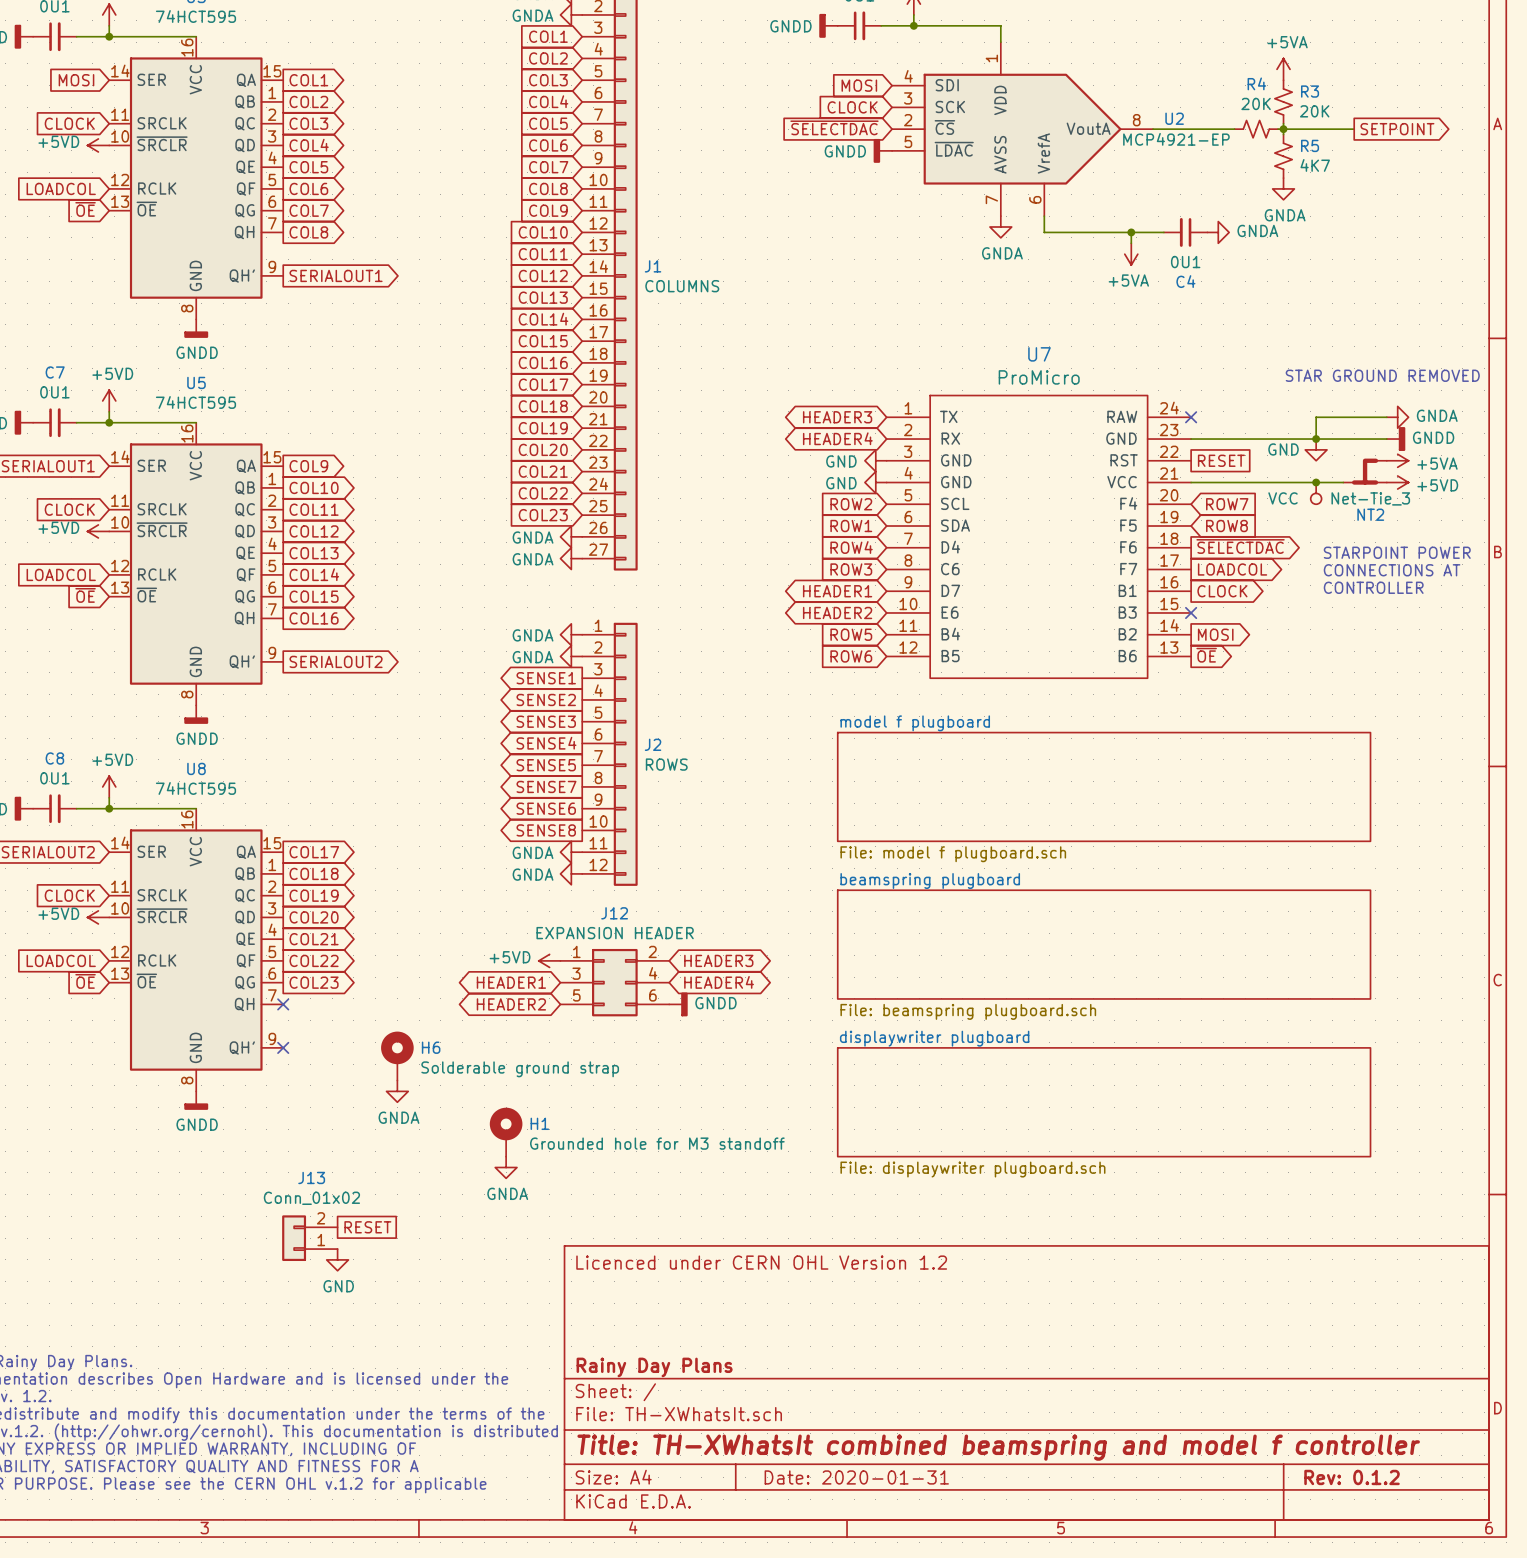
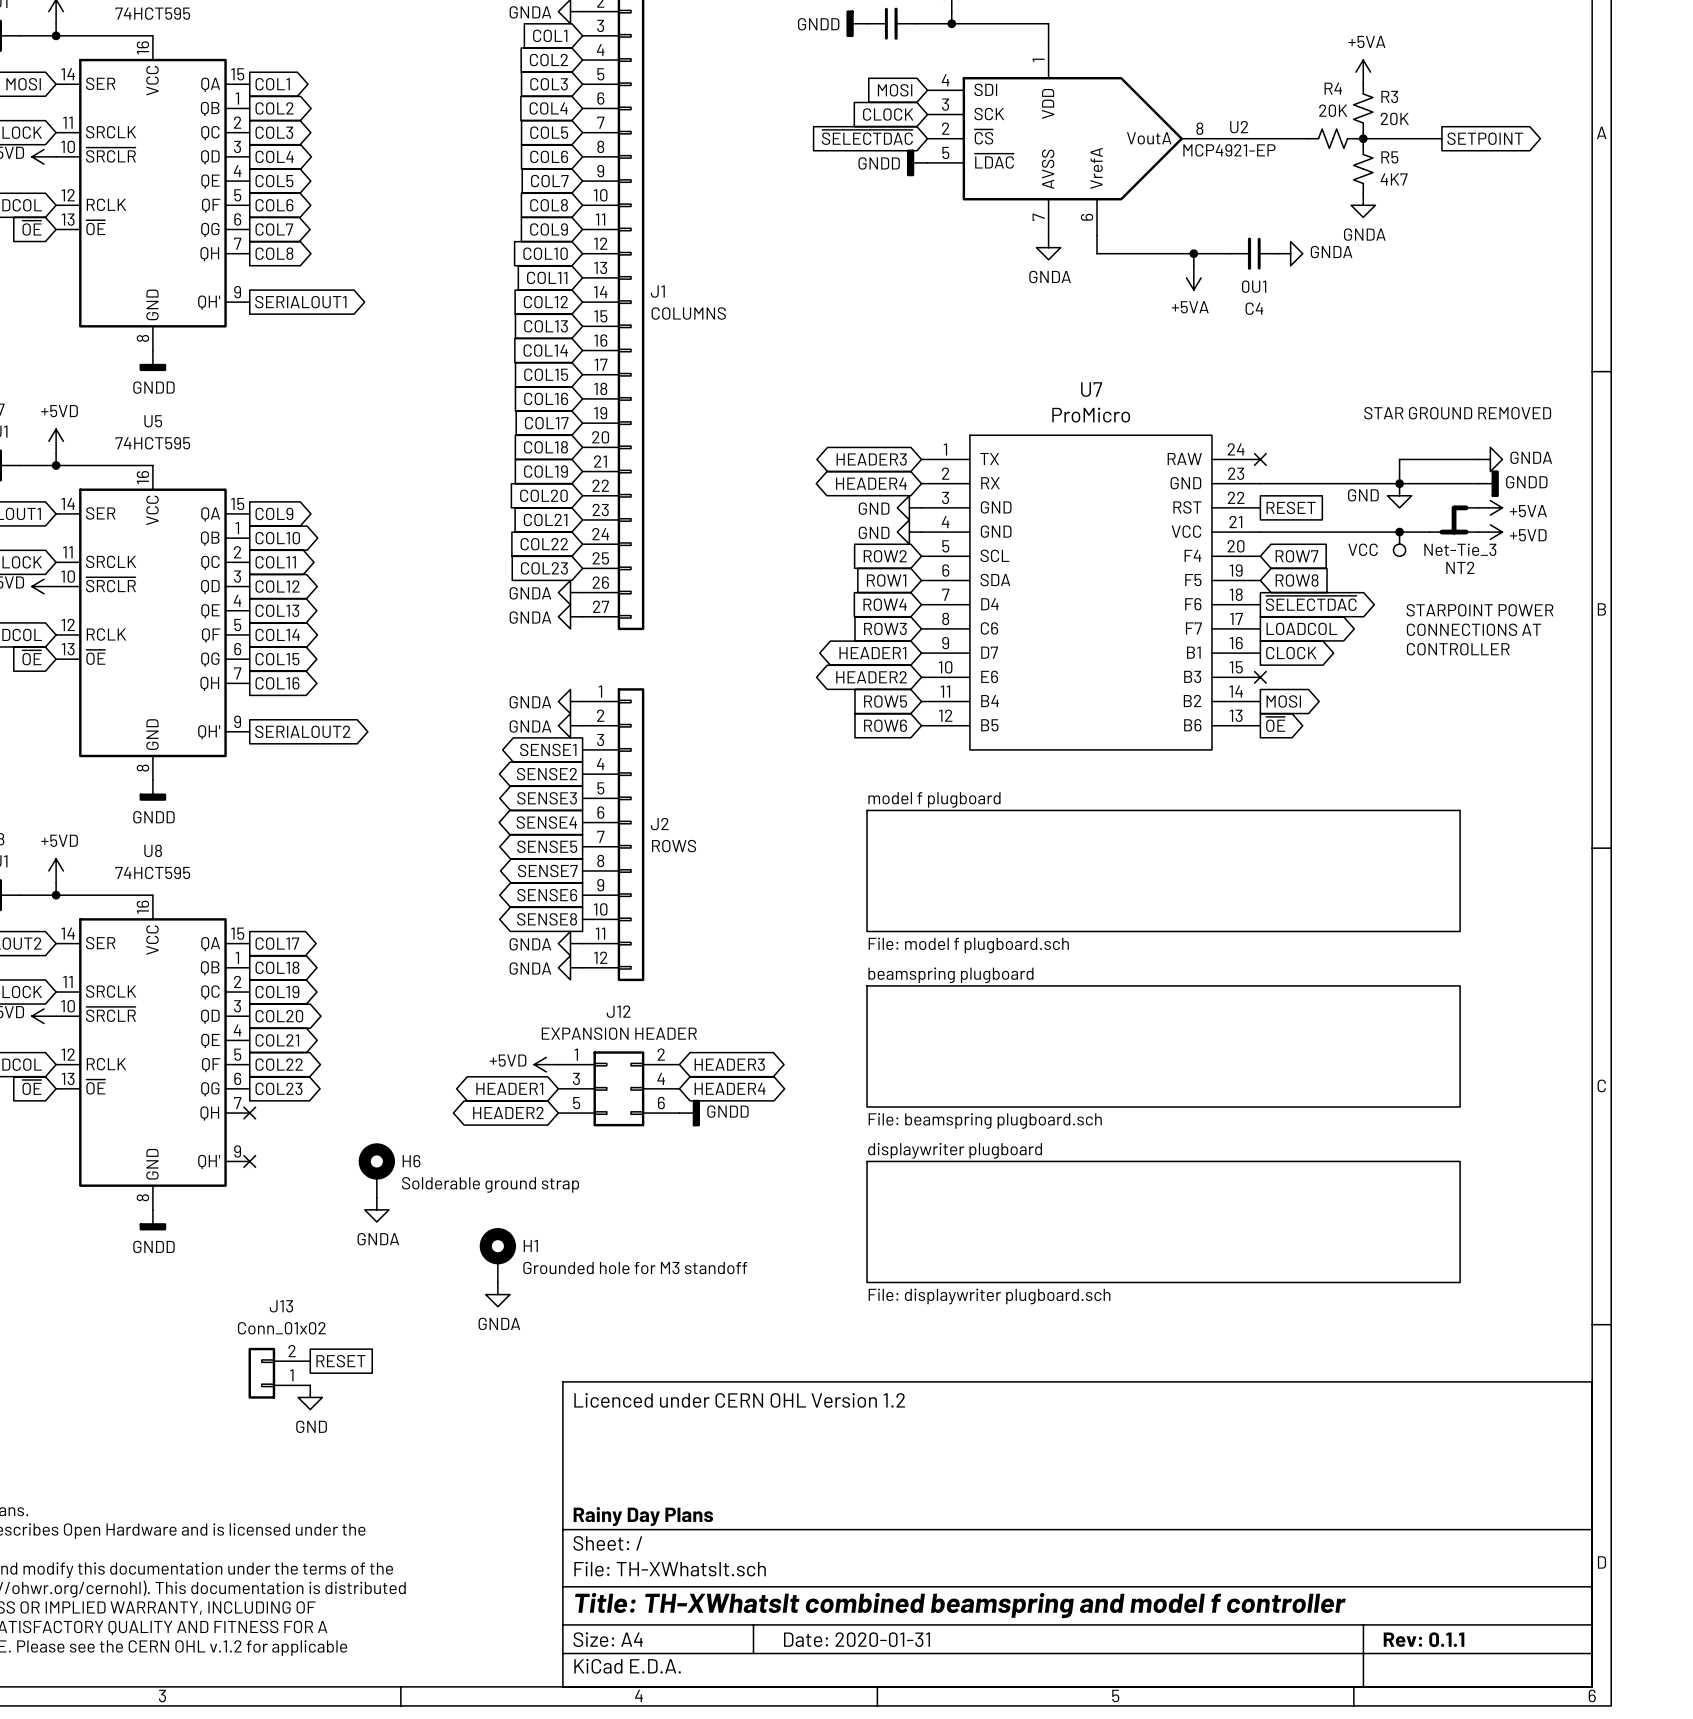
title block: Rev: 0.1.2 (1352, 1477) -> Rev: 0.1.1 (1424, 1639)

